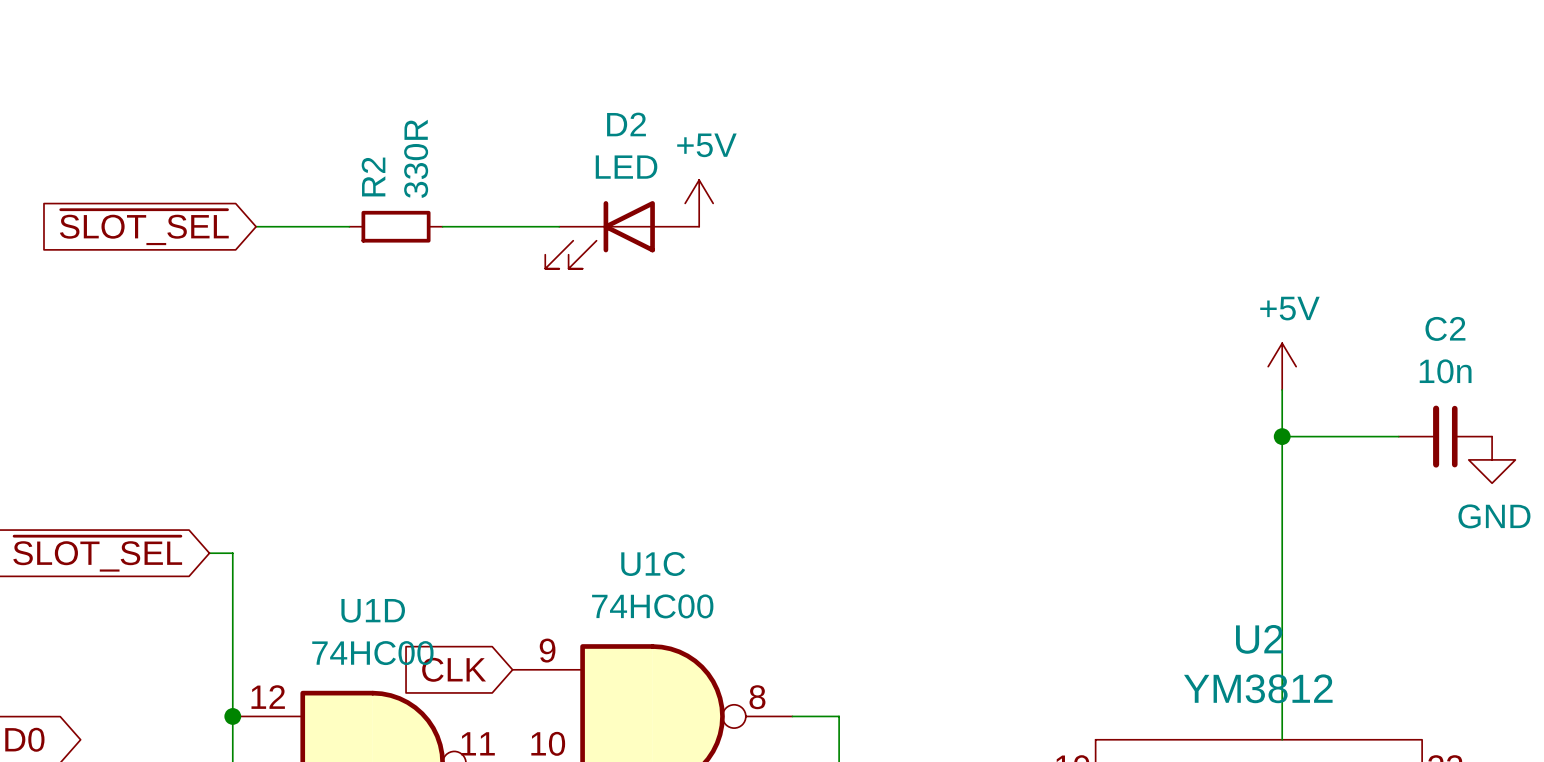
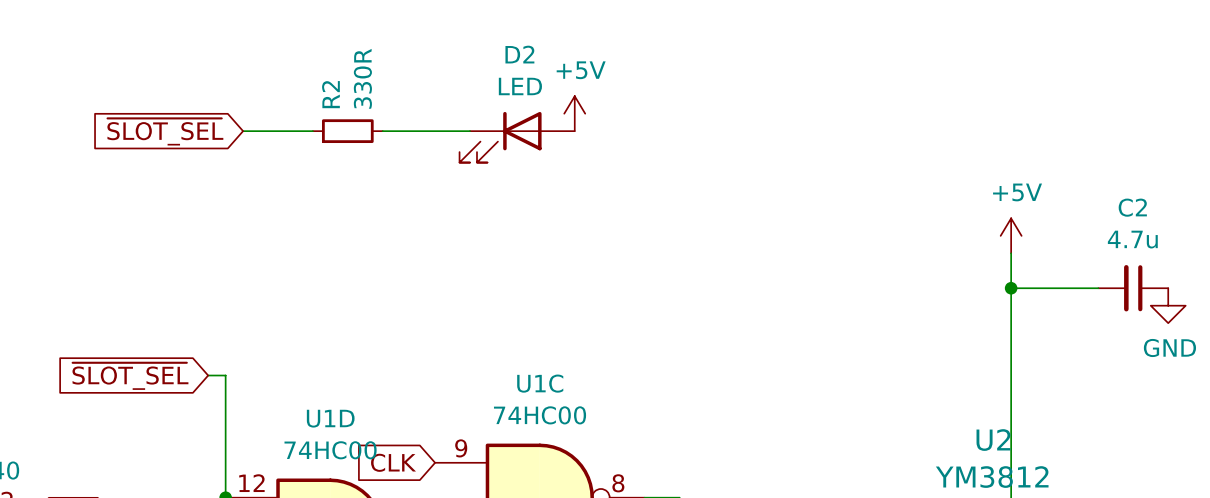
C2 value: 10n (1445, 371) -> 4.7u (1132, 239)

